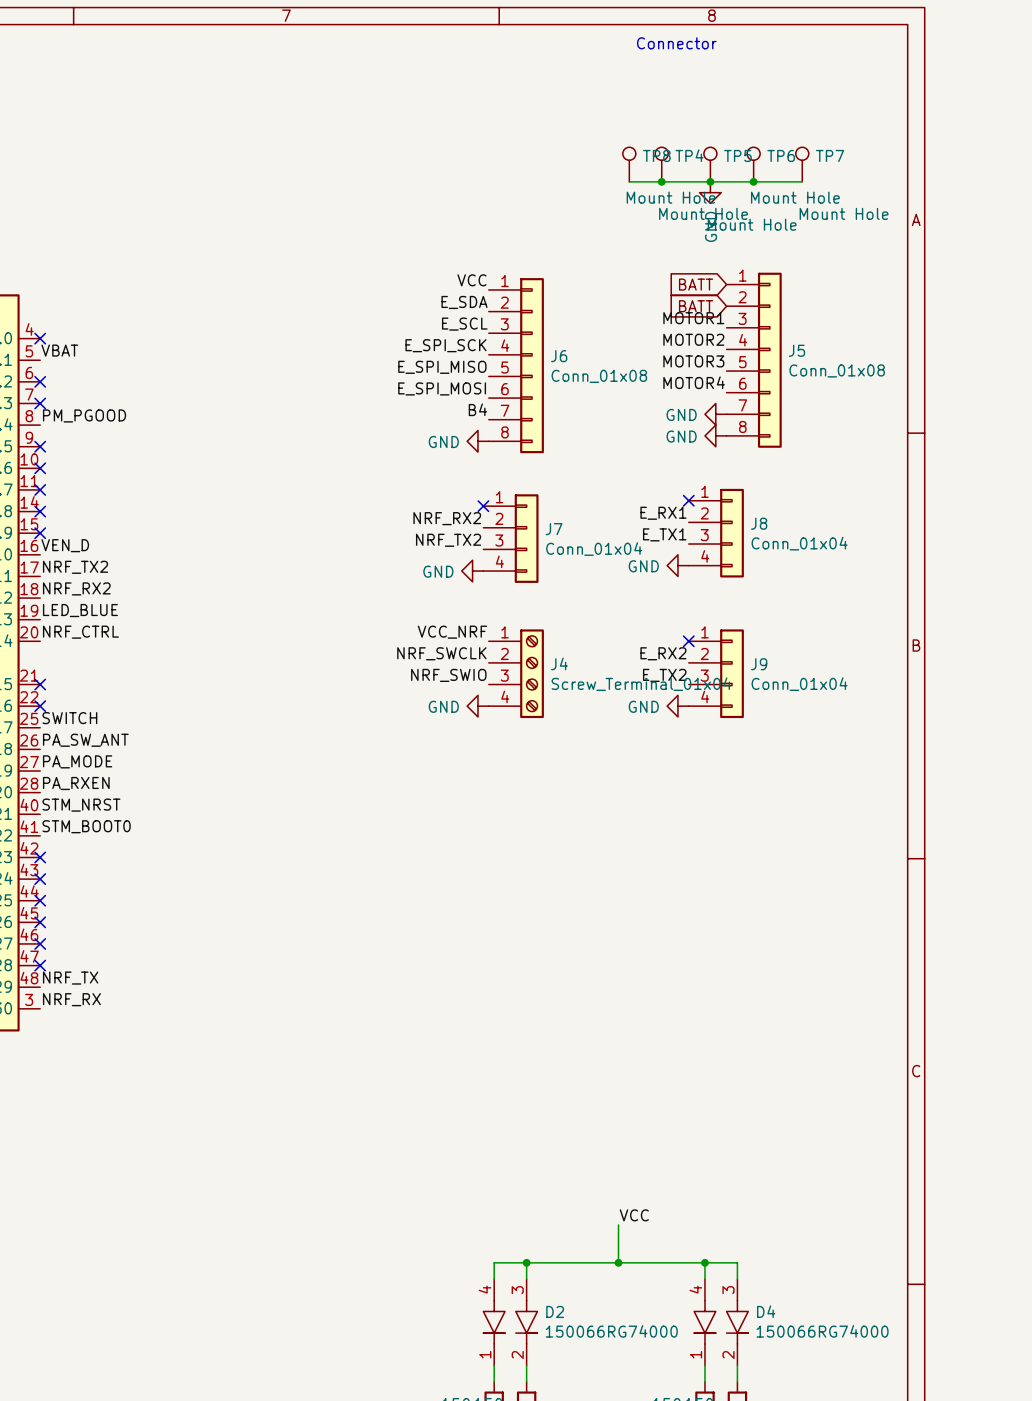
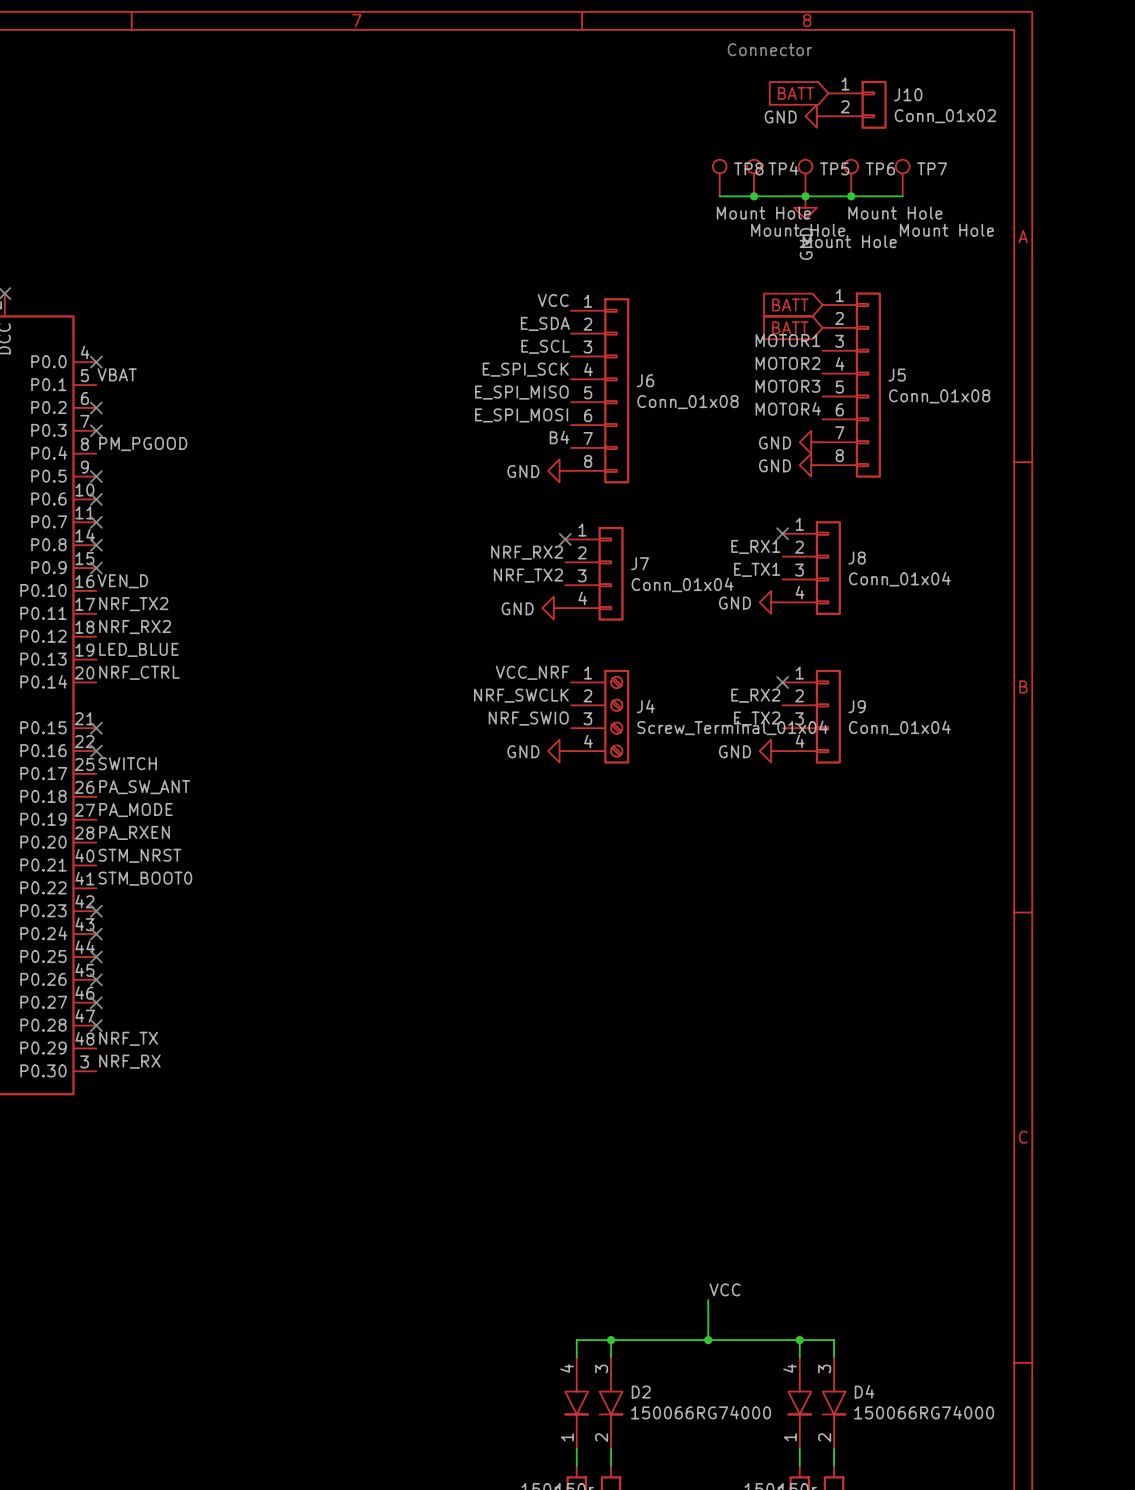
global label: none -> BATT (796, 93)
J10: none -> Conn_01x02 (857, 104)
power symbol: none -> GND (816, 116)

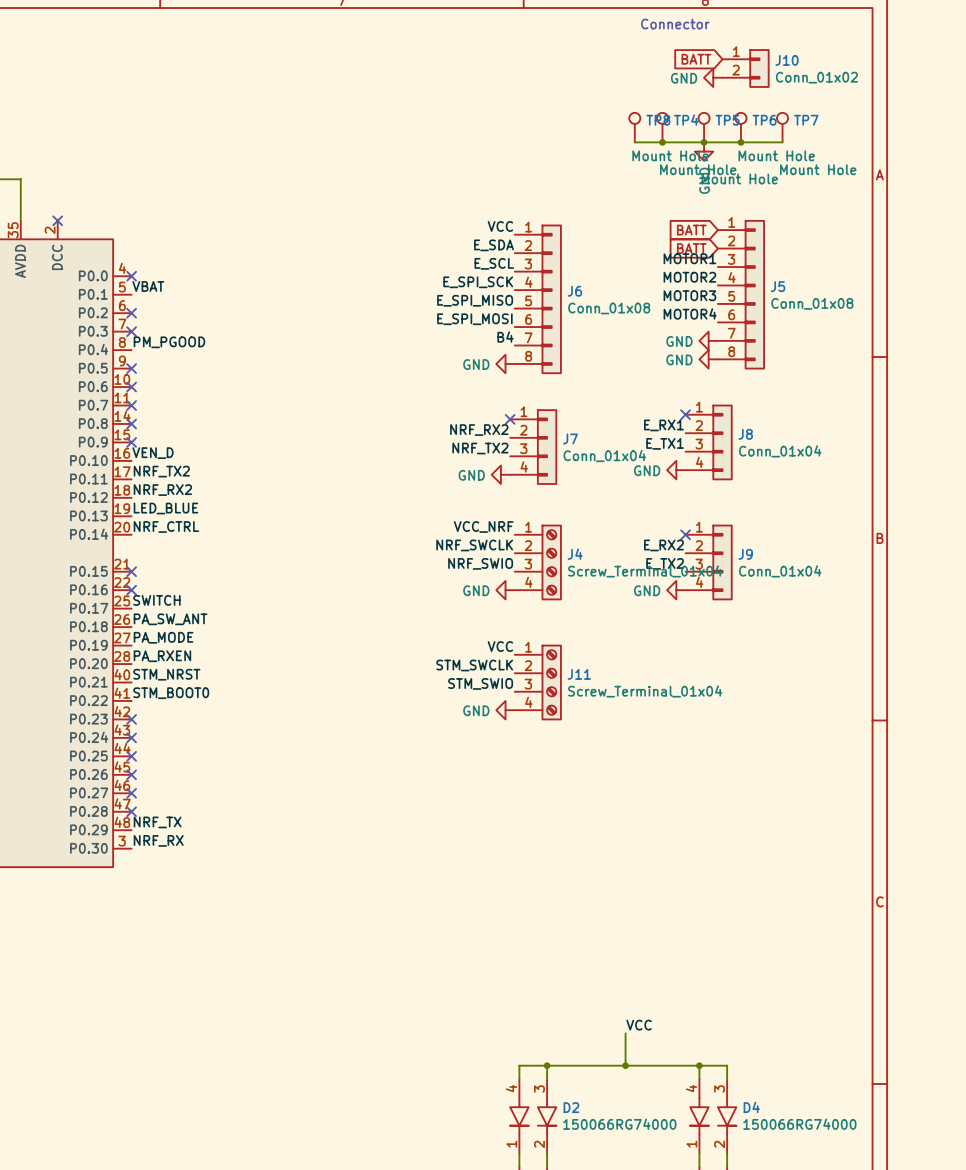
label: none -> VCC (500, 646)
label: none -> STM_SWCLK (474, 665)
J11: none -> Screw_Terminal_01x04 (538, 682)
label: none -> STM_SWIO (480, 683)
power symbol: none -> GND (505, 710)

